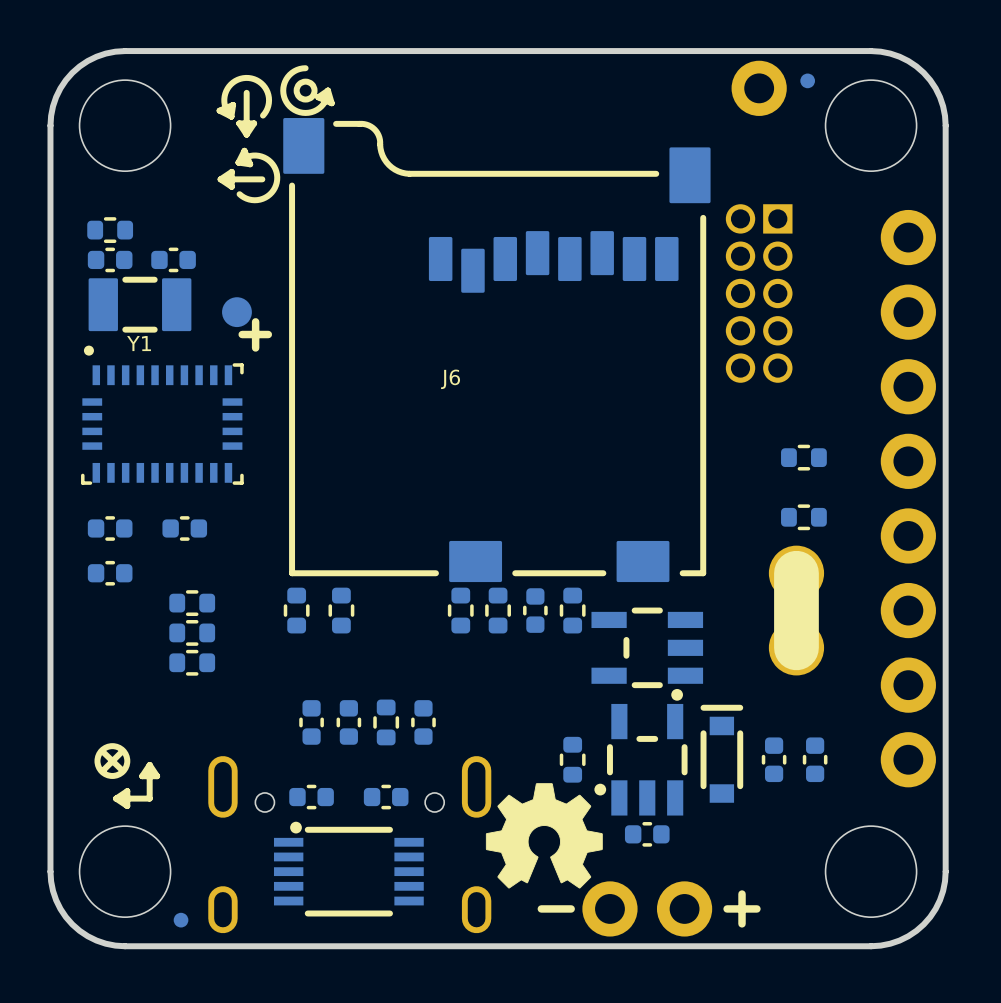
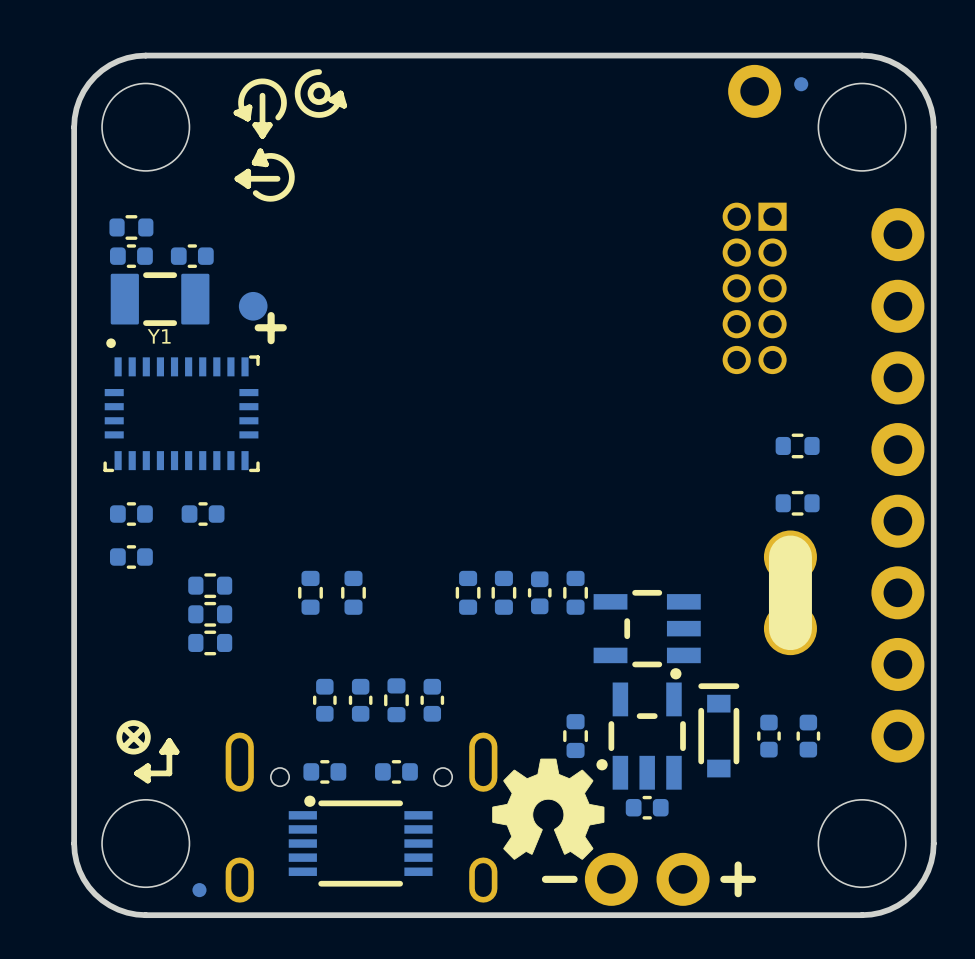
J6: (496, 350) -> none

